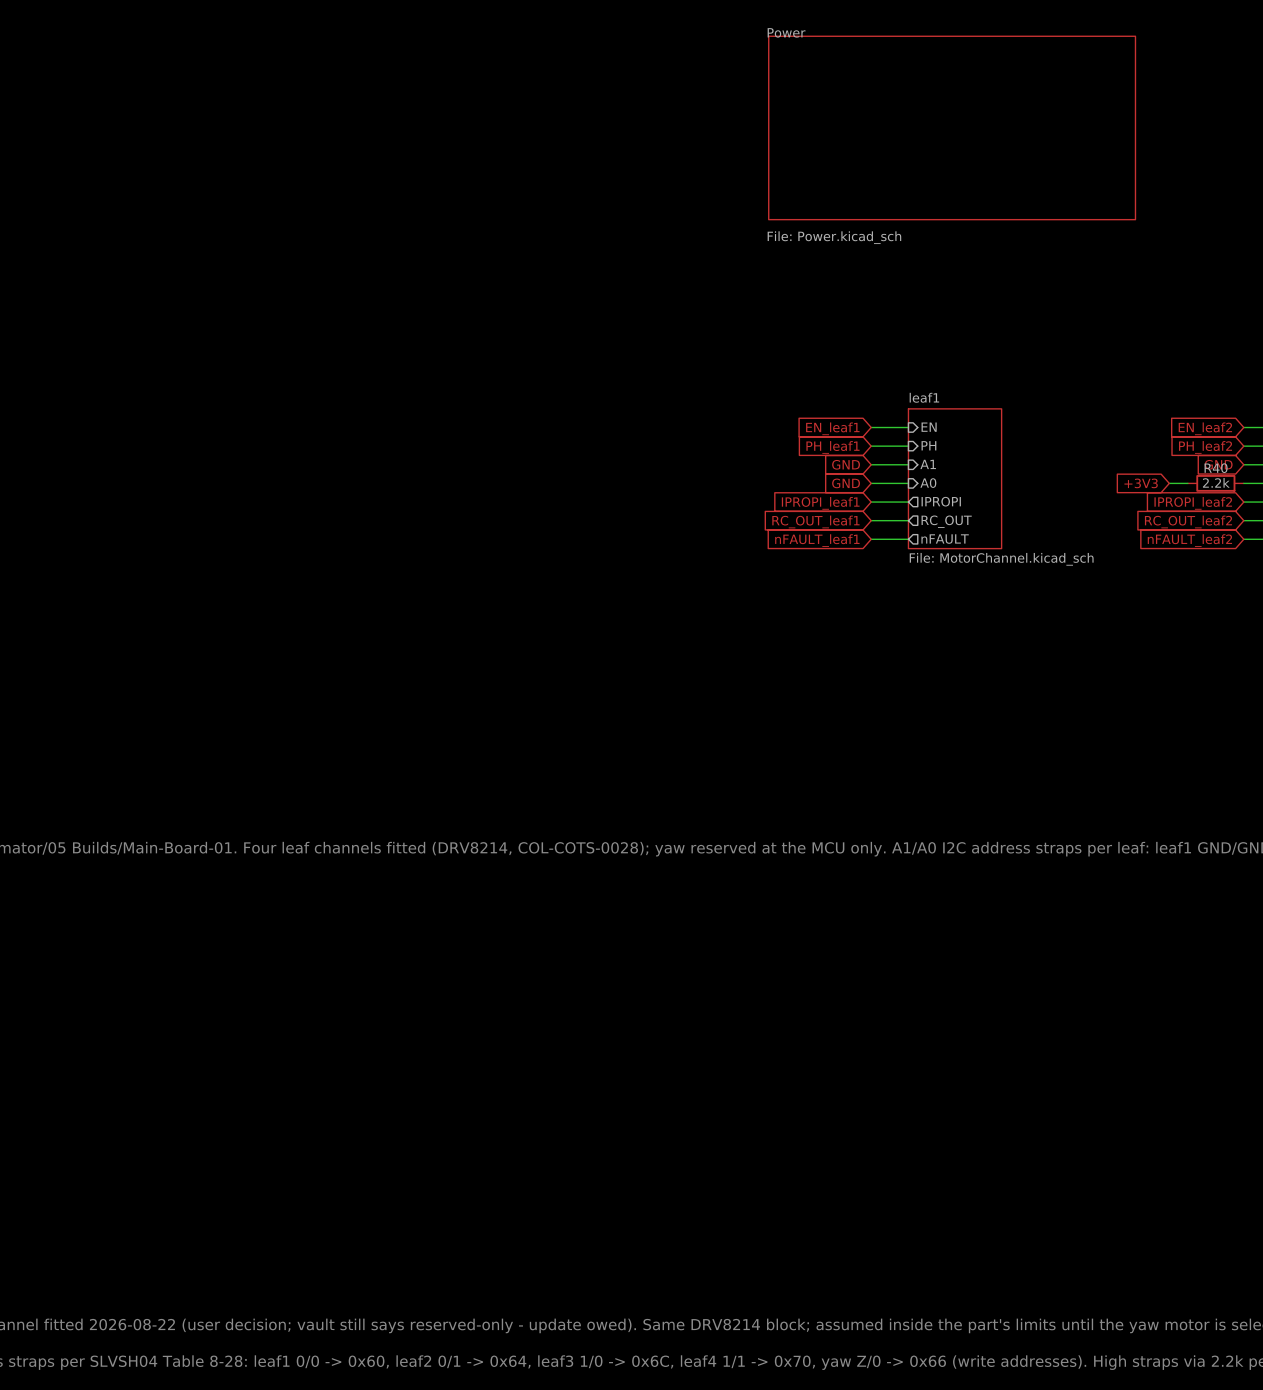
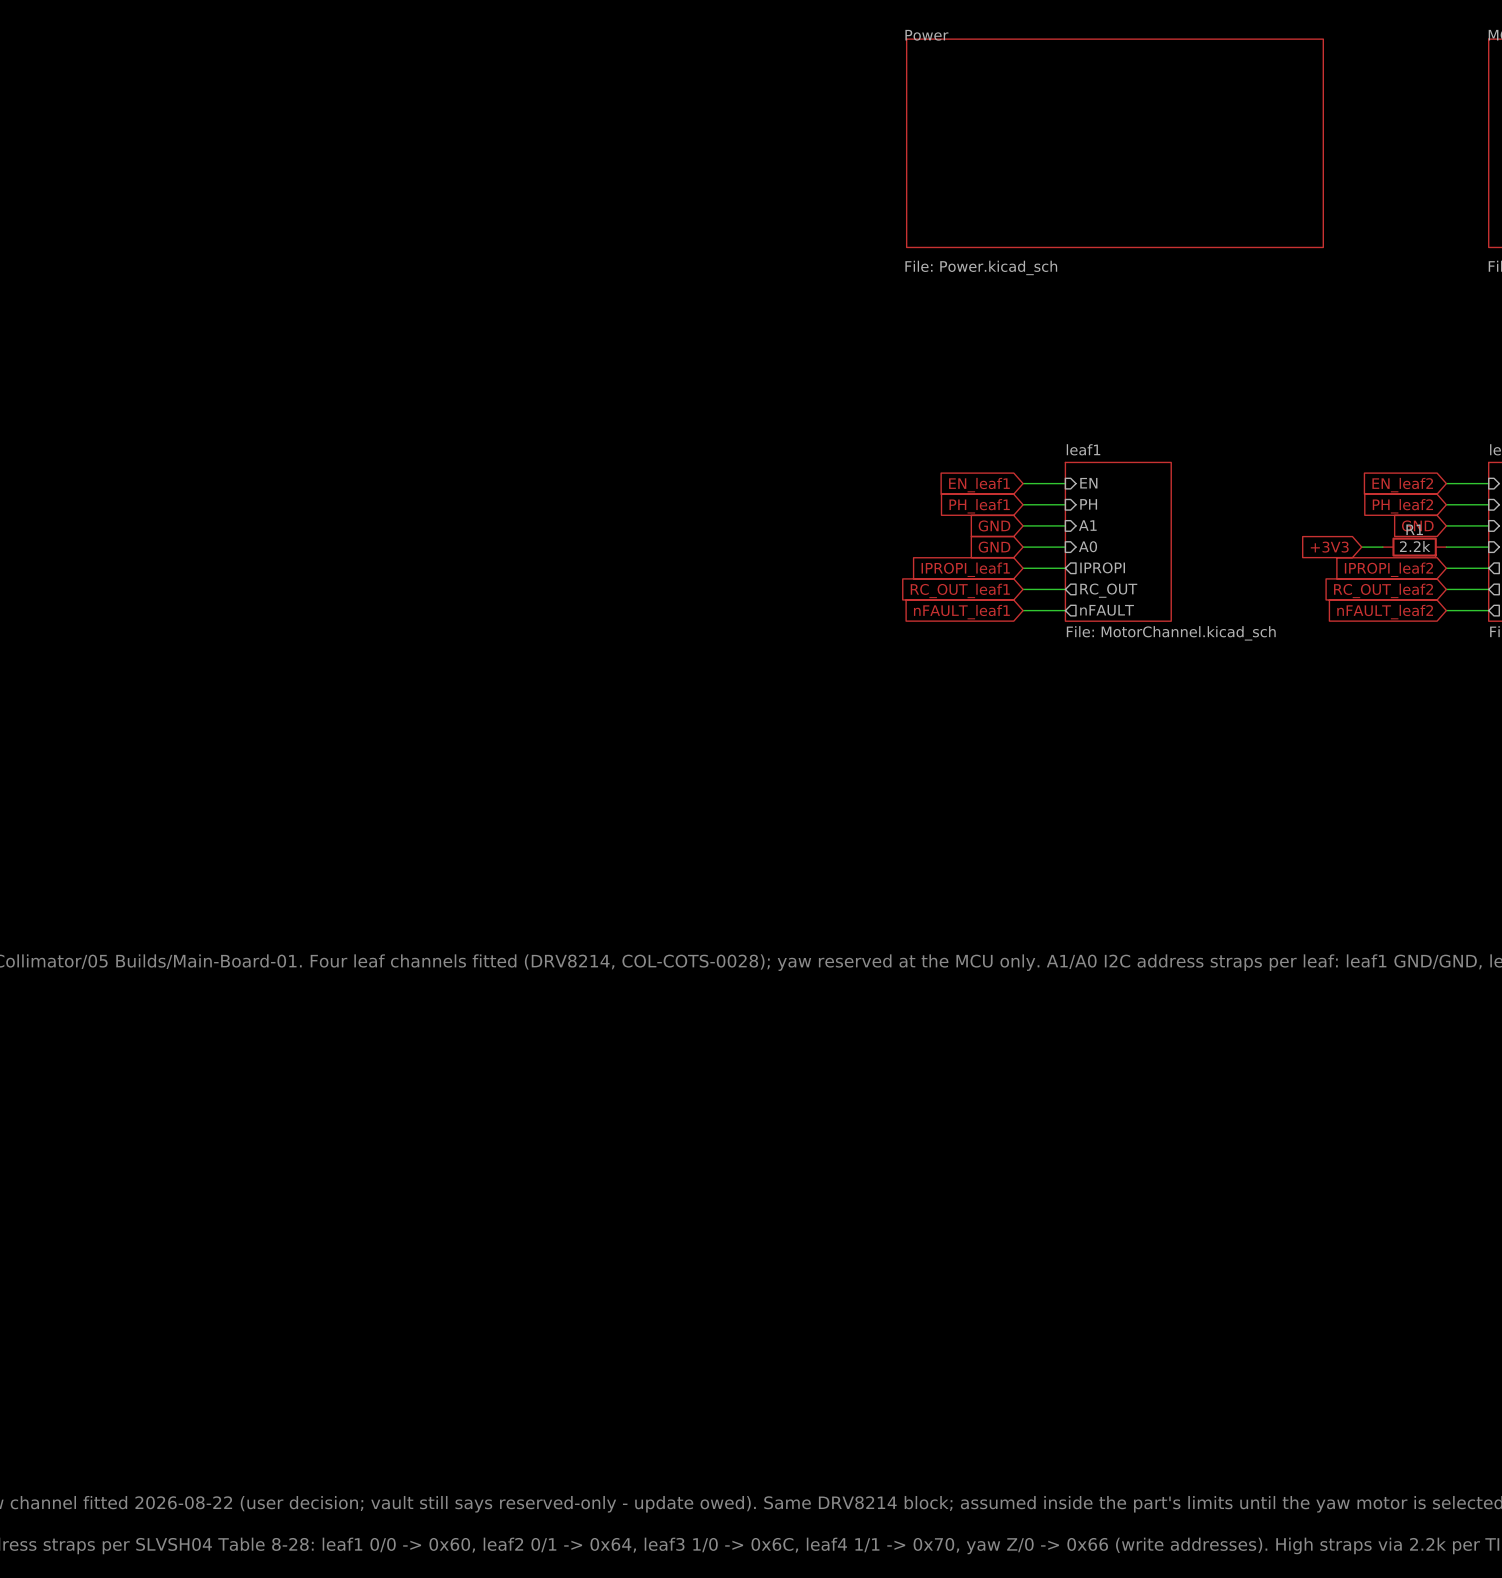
R40 name: R40 (1216, 468) -> R1 (1414, 529)

